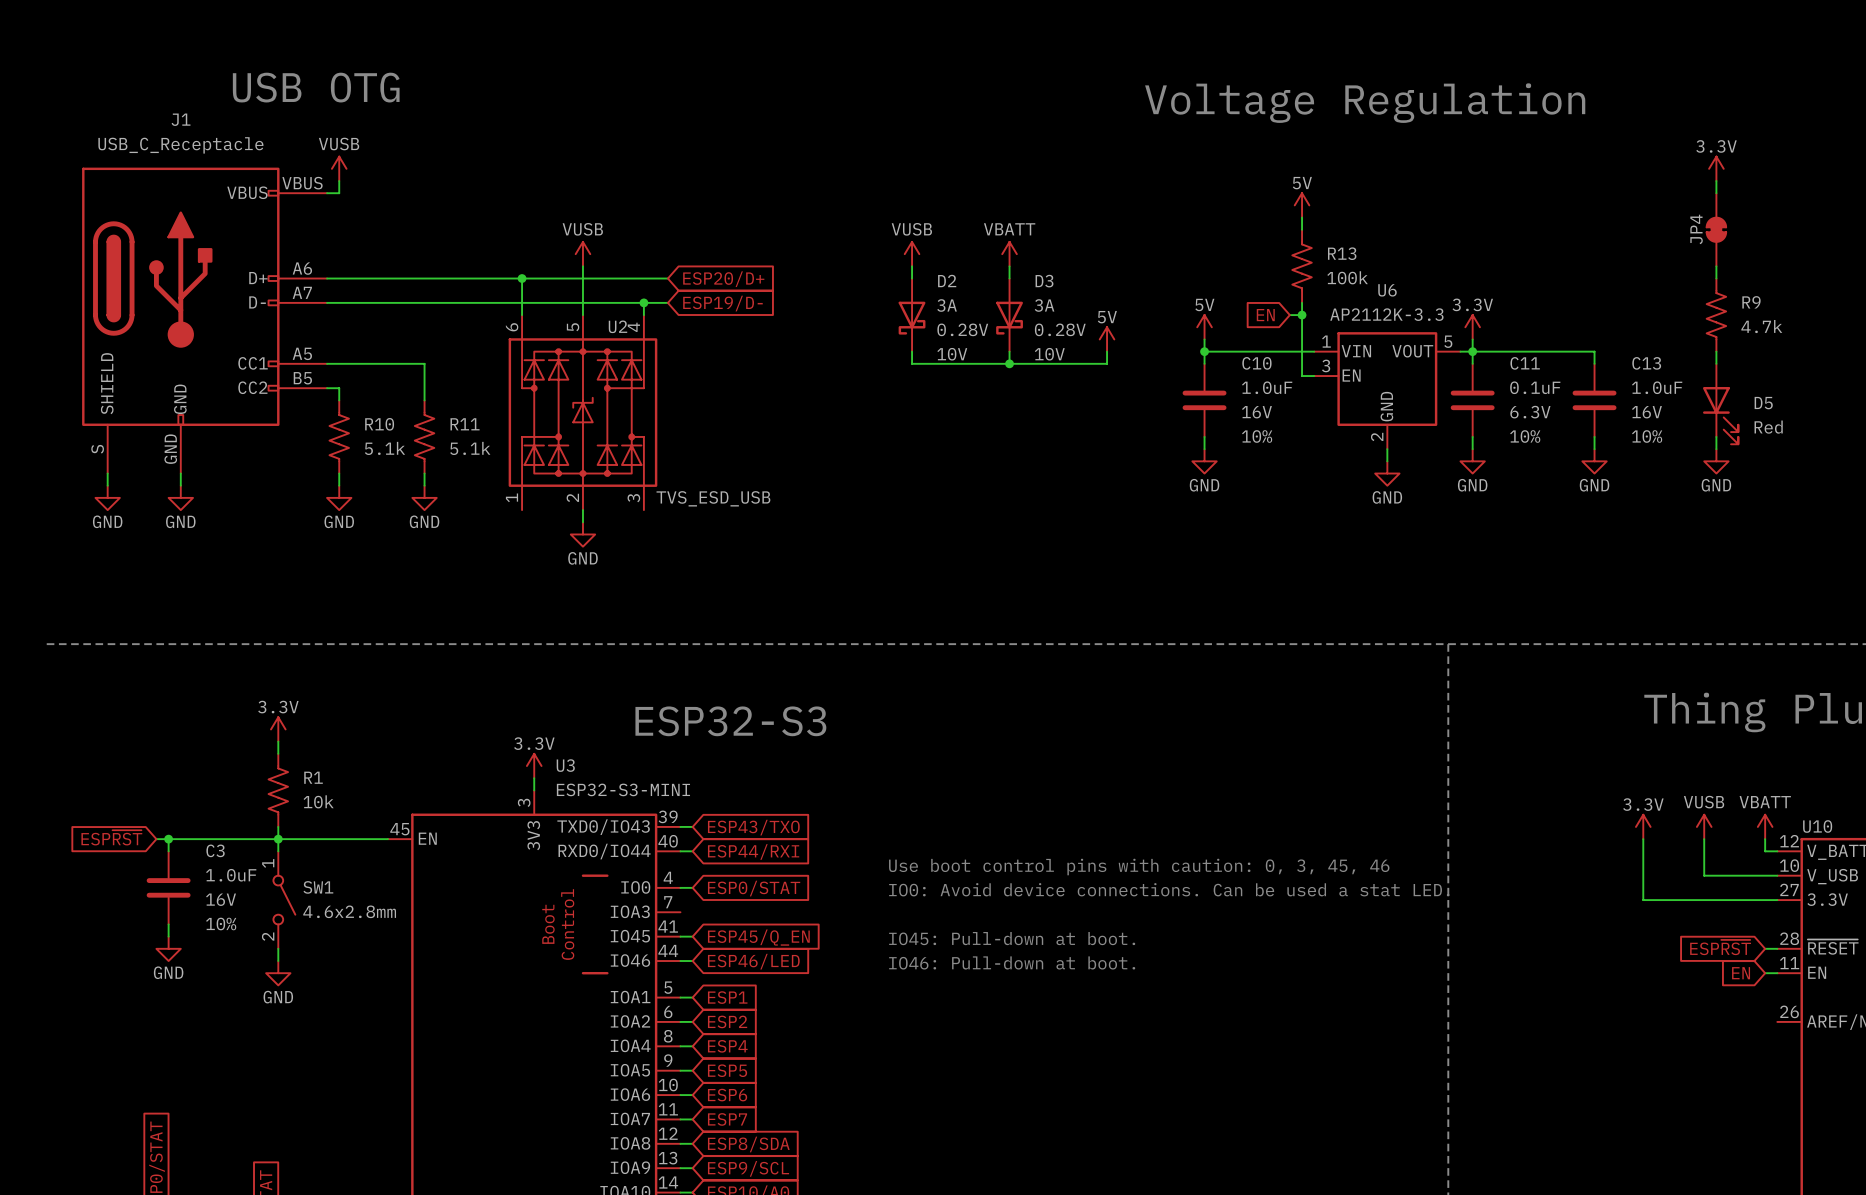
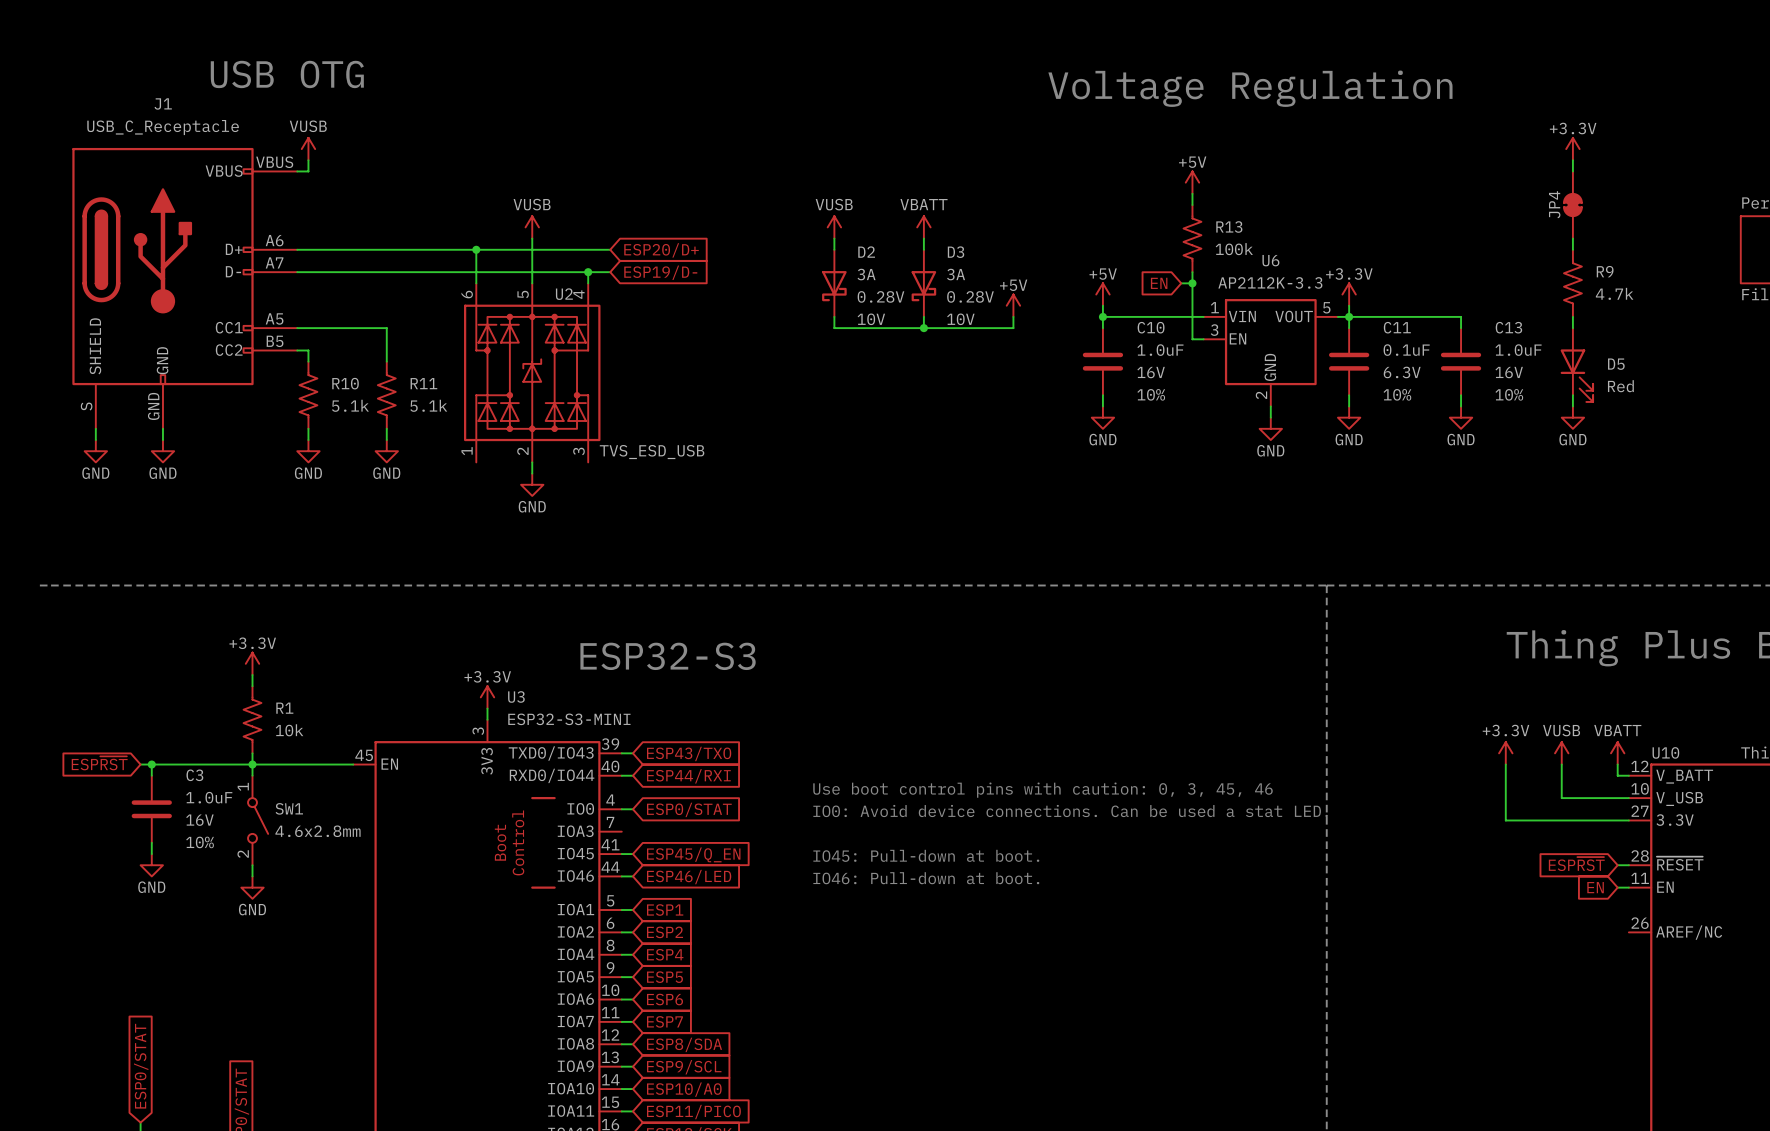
power symbol: 3.3V (1716, 168) -> +3.3V (1572, 149)
power symbol: 5V (1302, 205) -> +5V (1192, 182)
power symbol: 5V (1204, 327) -> +5V (1102, 294)
power symbol: 3.3V (1472, 327) -> +3.3V (1349, 294)
power symbol: 5V (1107, 339) -> +5V (1013, 305)
power symbol: 3.3V (278, 729) -> +3.3V (252, 663)
power symbol: 3.3V (534, 766) -> +3.3V (487, 697)
power symbol: 3.3V (1643, 826) -> +3.3V (1505, 753)

